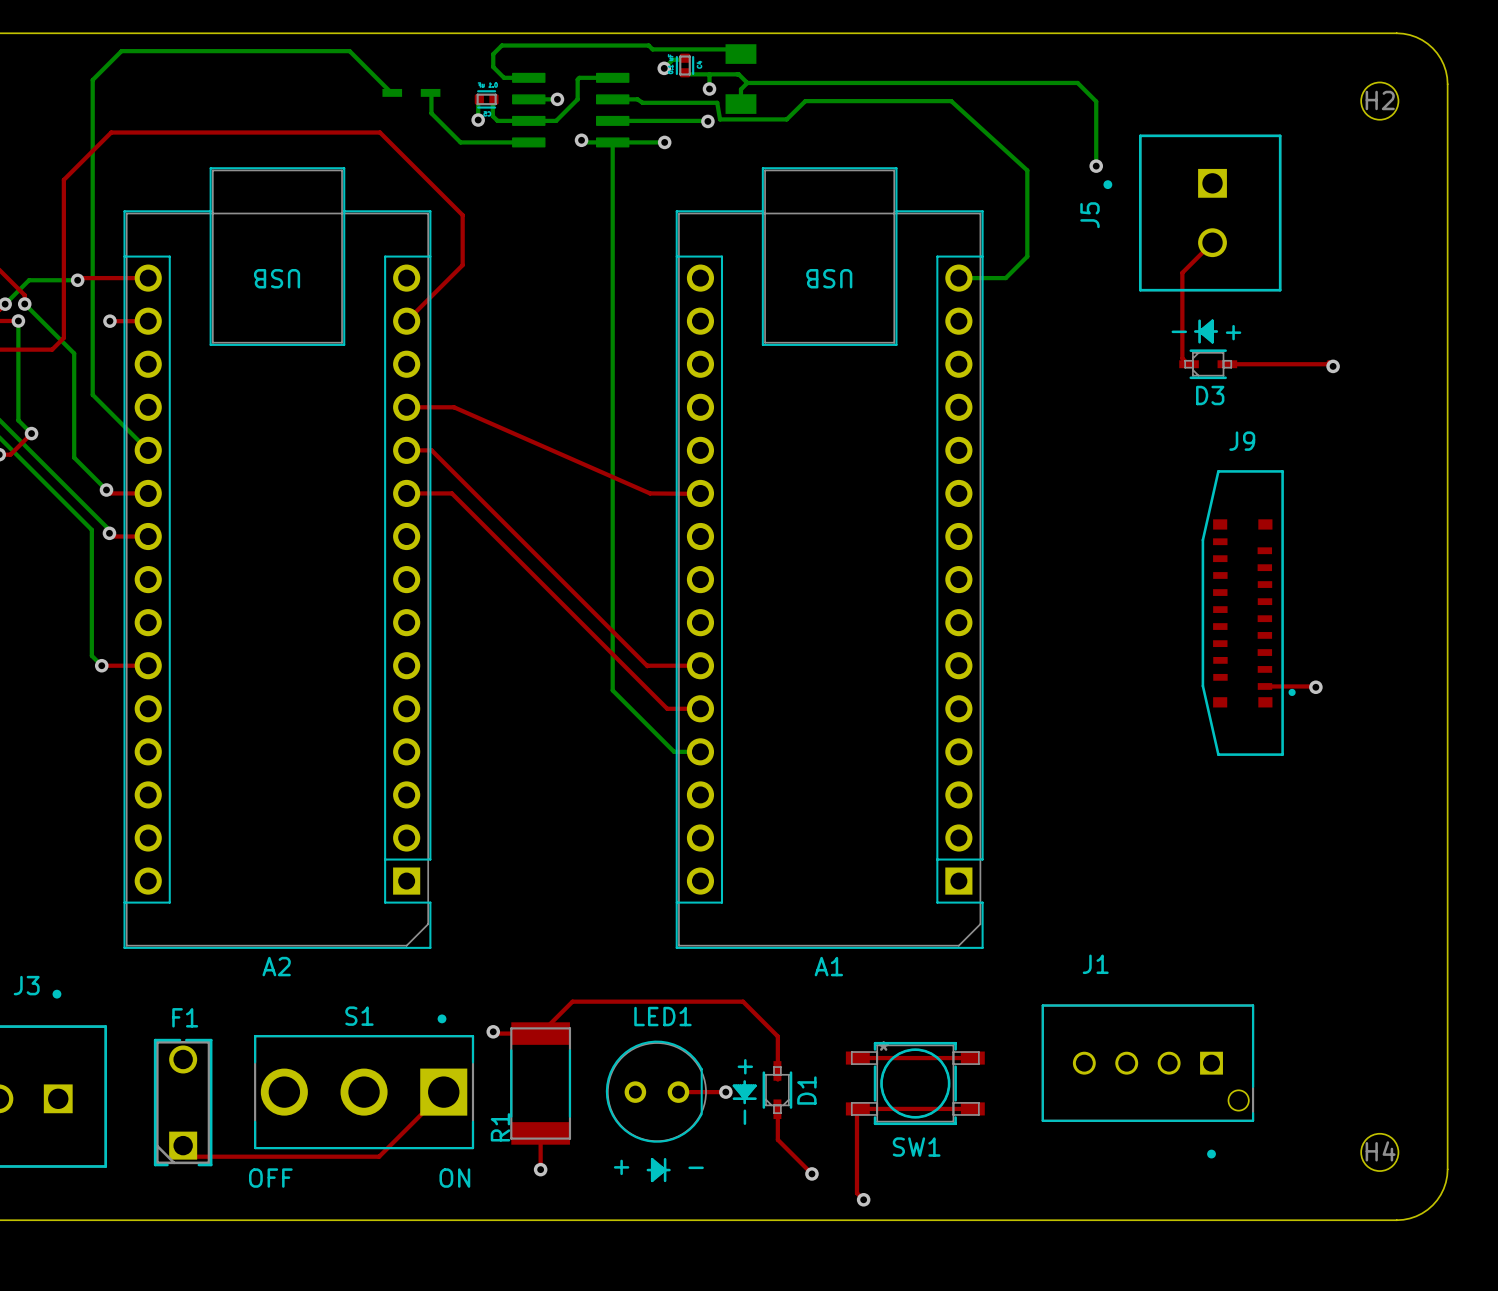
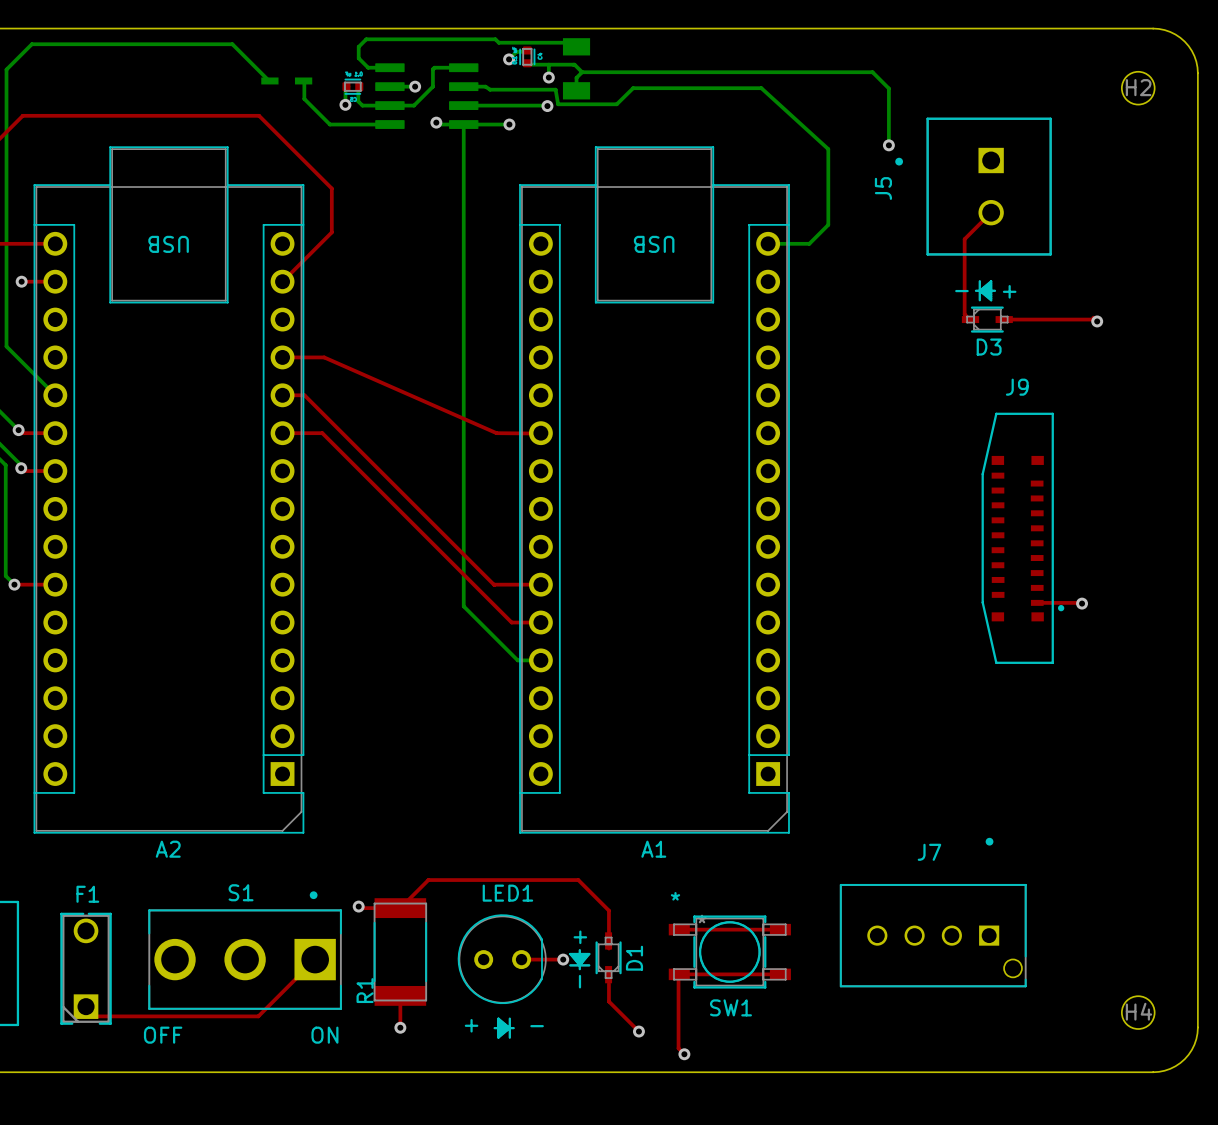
SW1 text: none -> * (675, 896)
J7: none -> (933, 912)
J1: (1147, 1081) -> none

